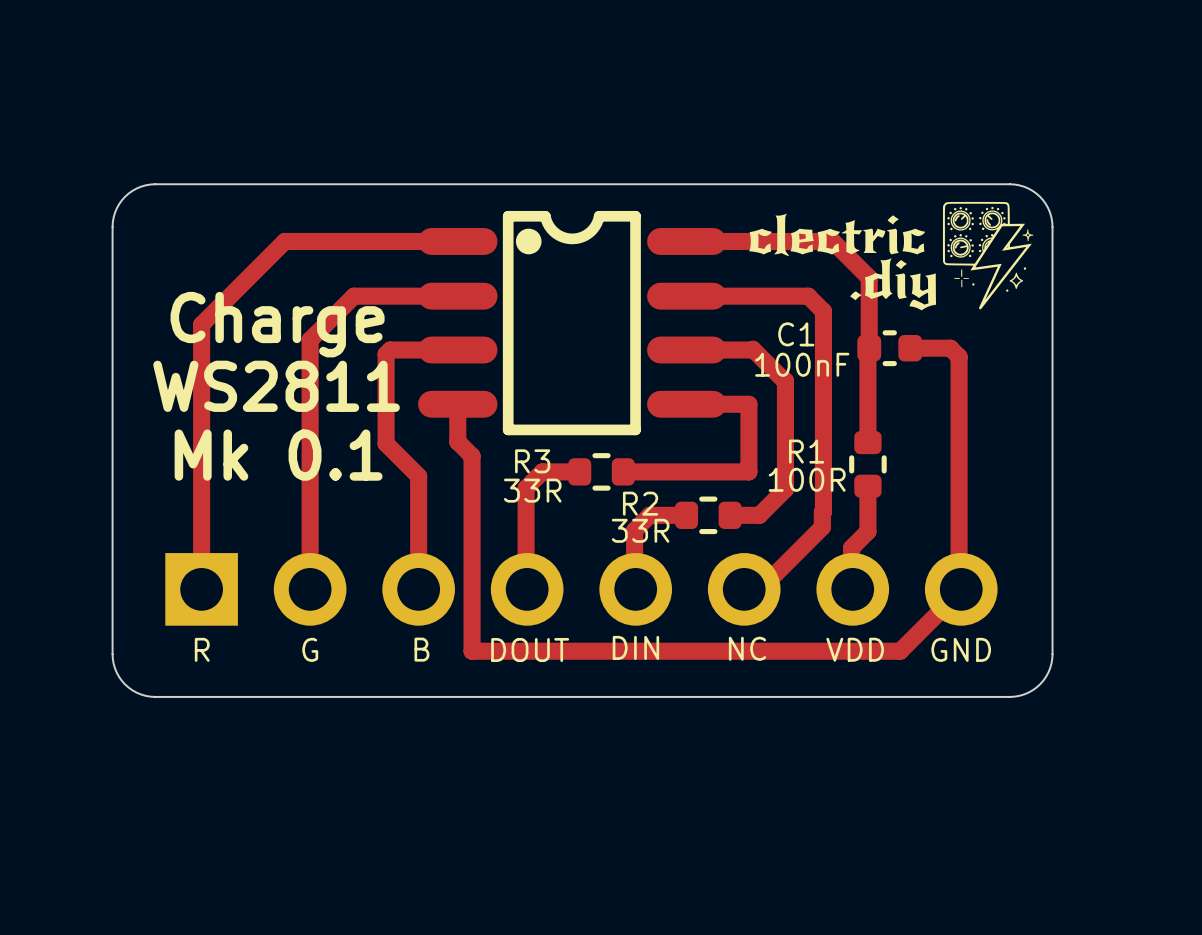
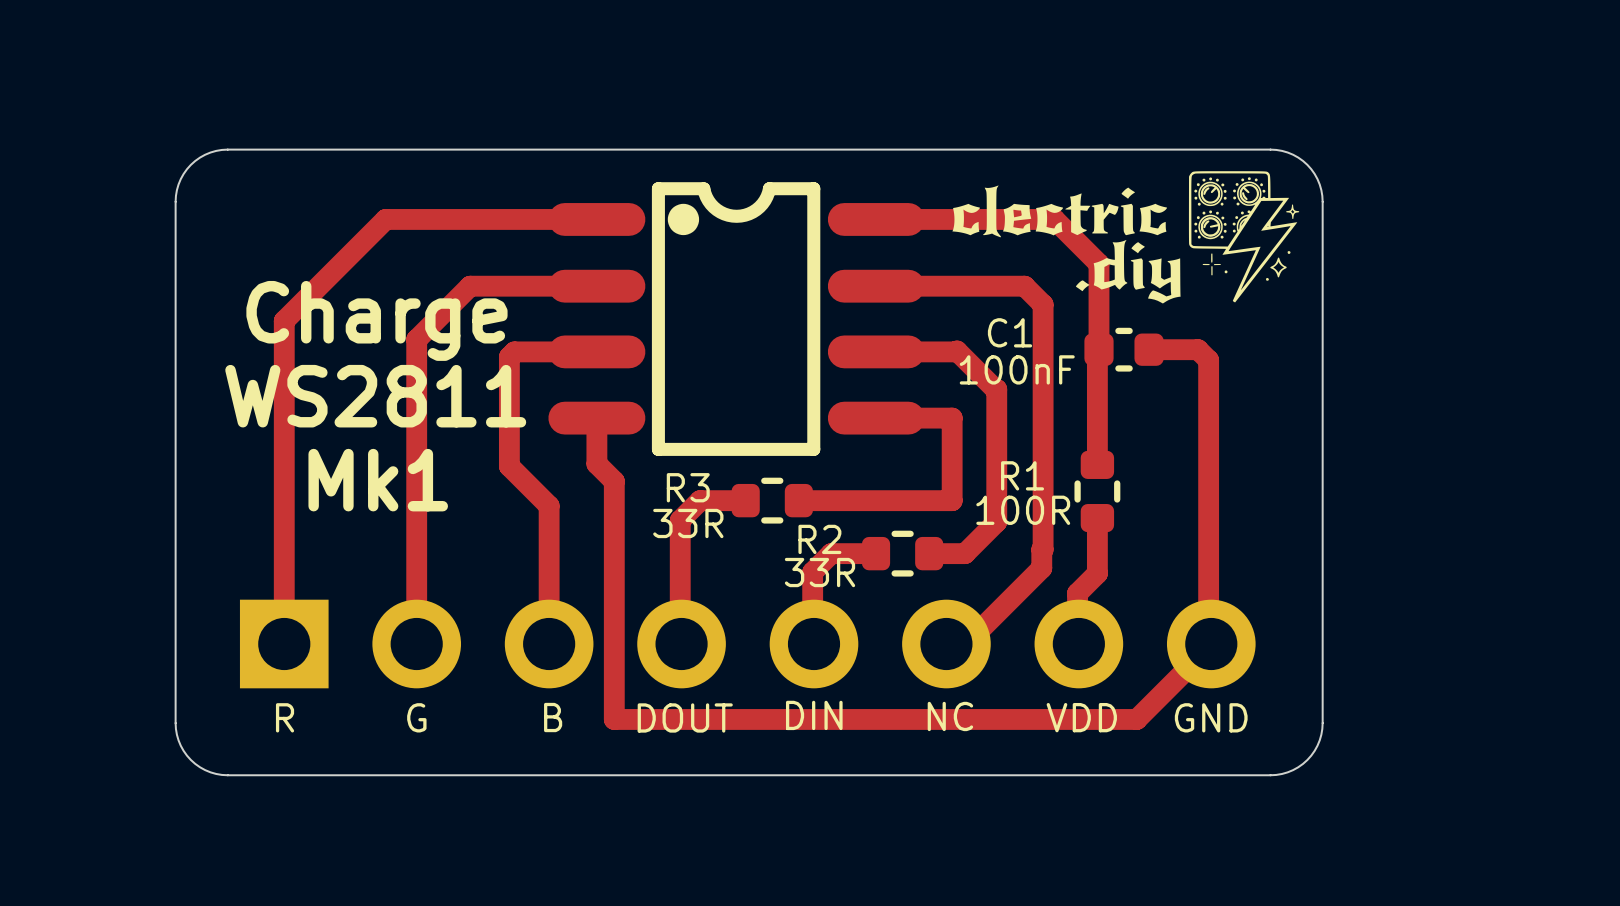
text: Mk 0.1 (278, 455) -> Mk1 (378, 480)

